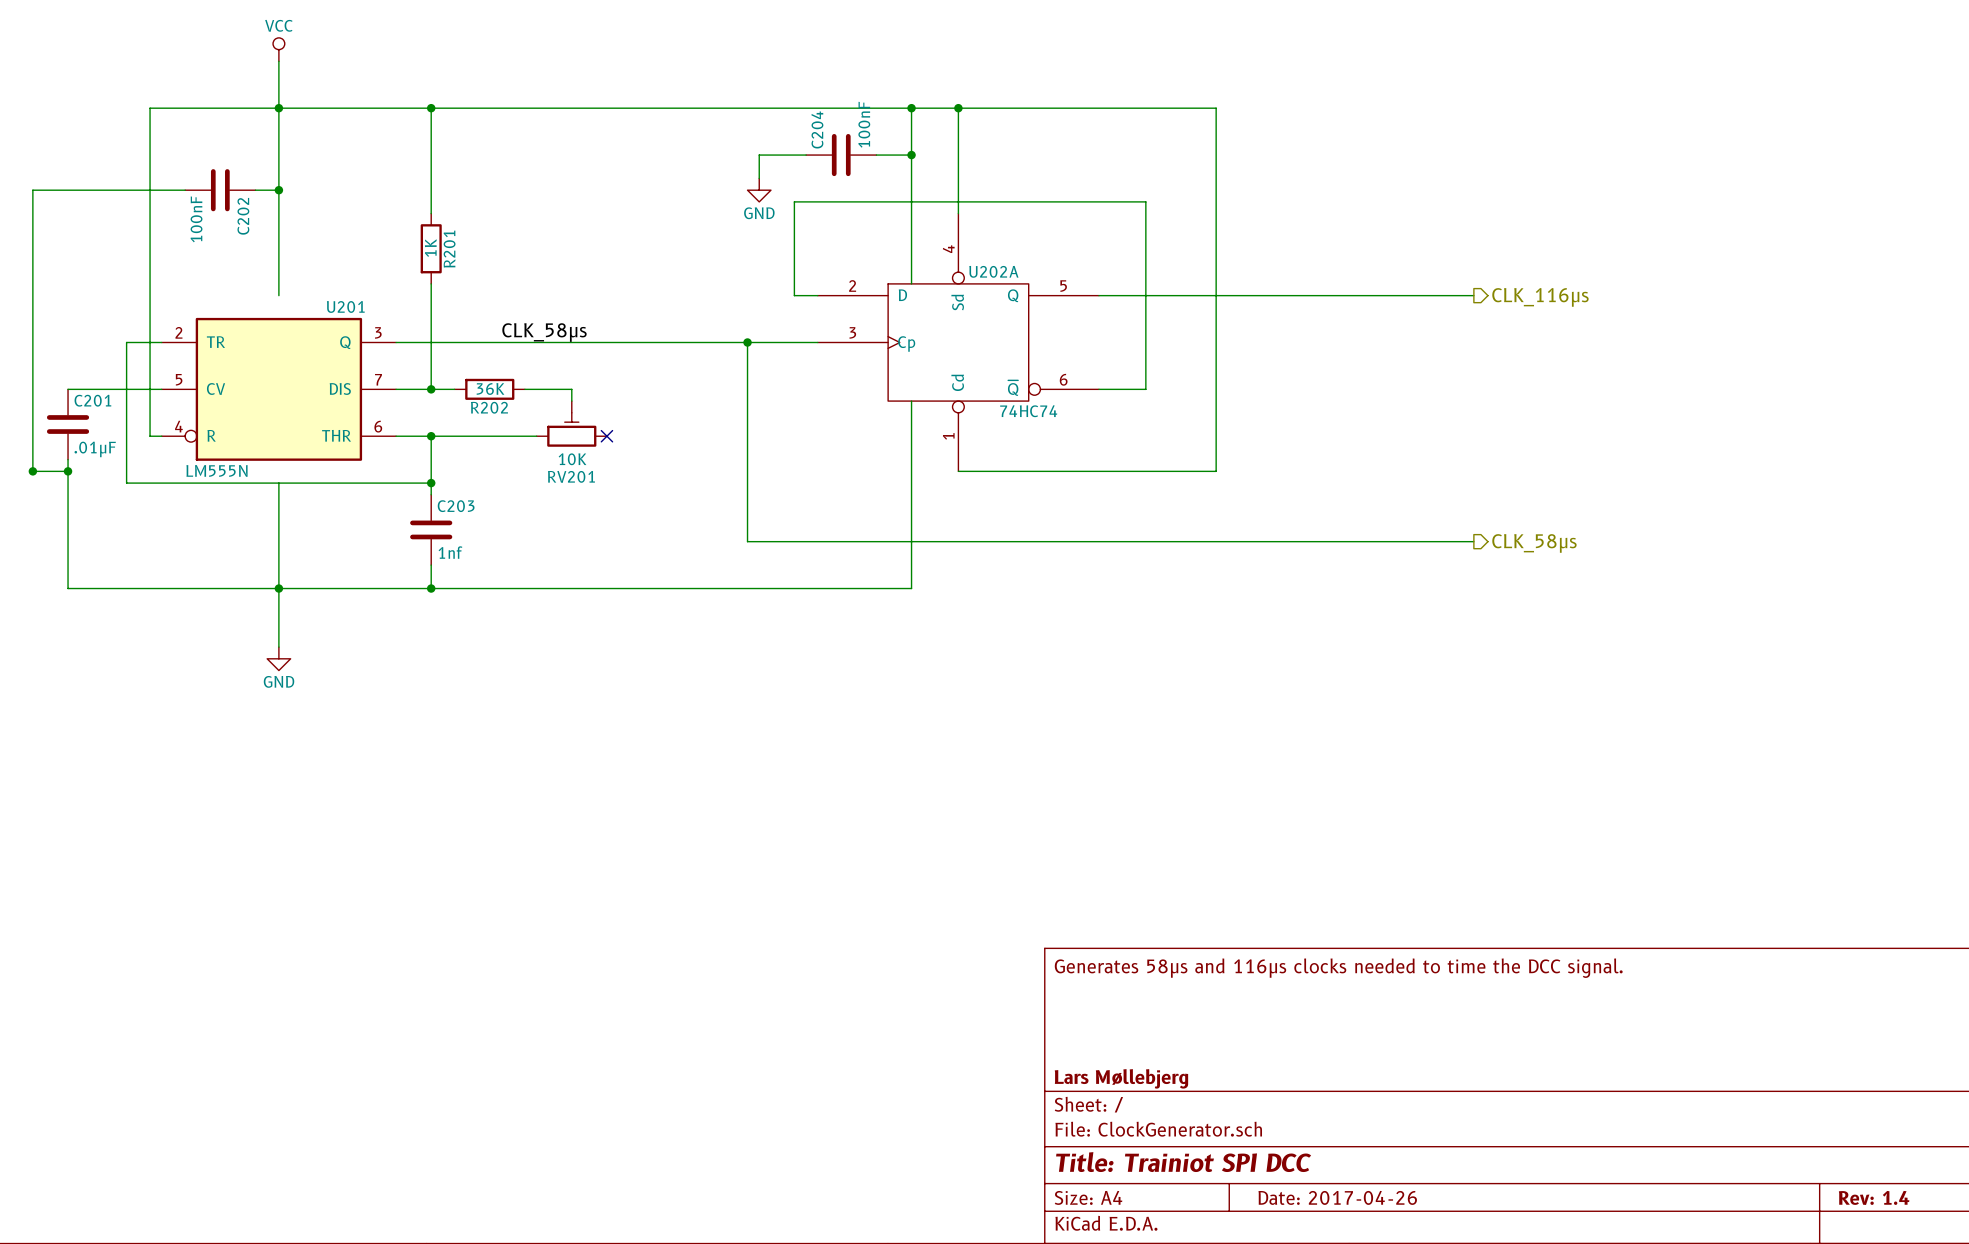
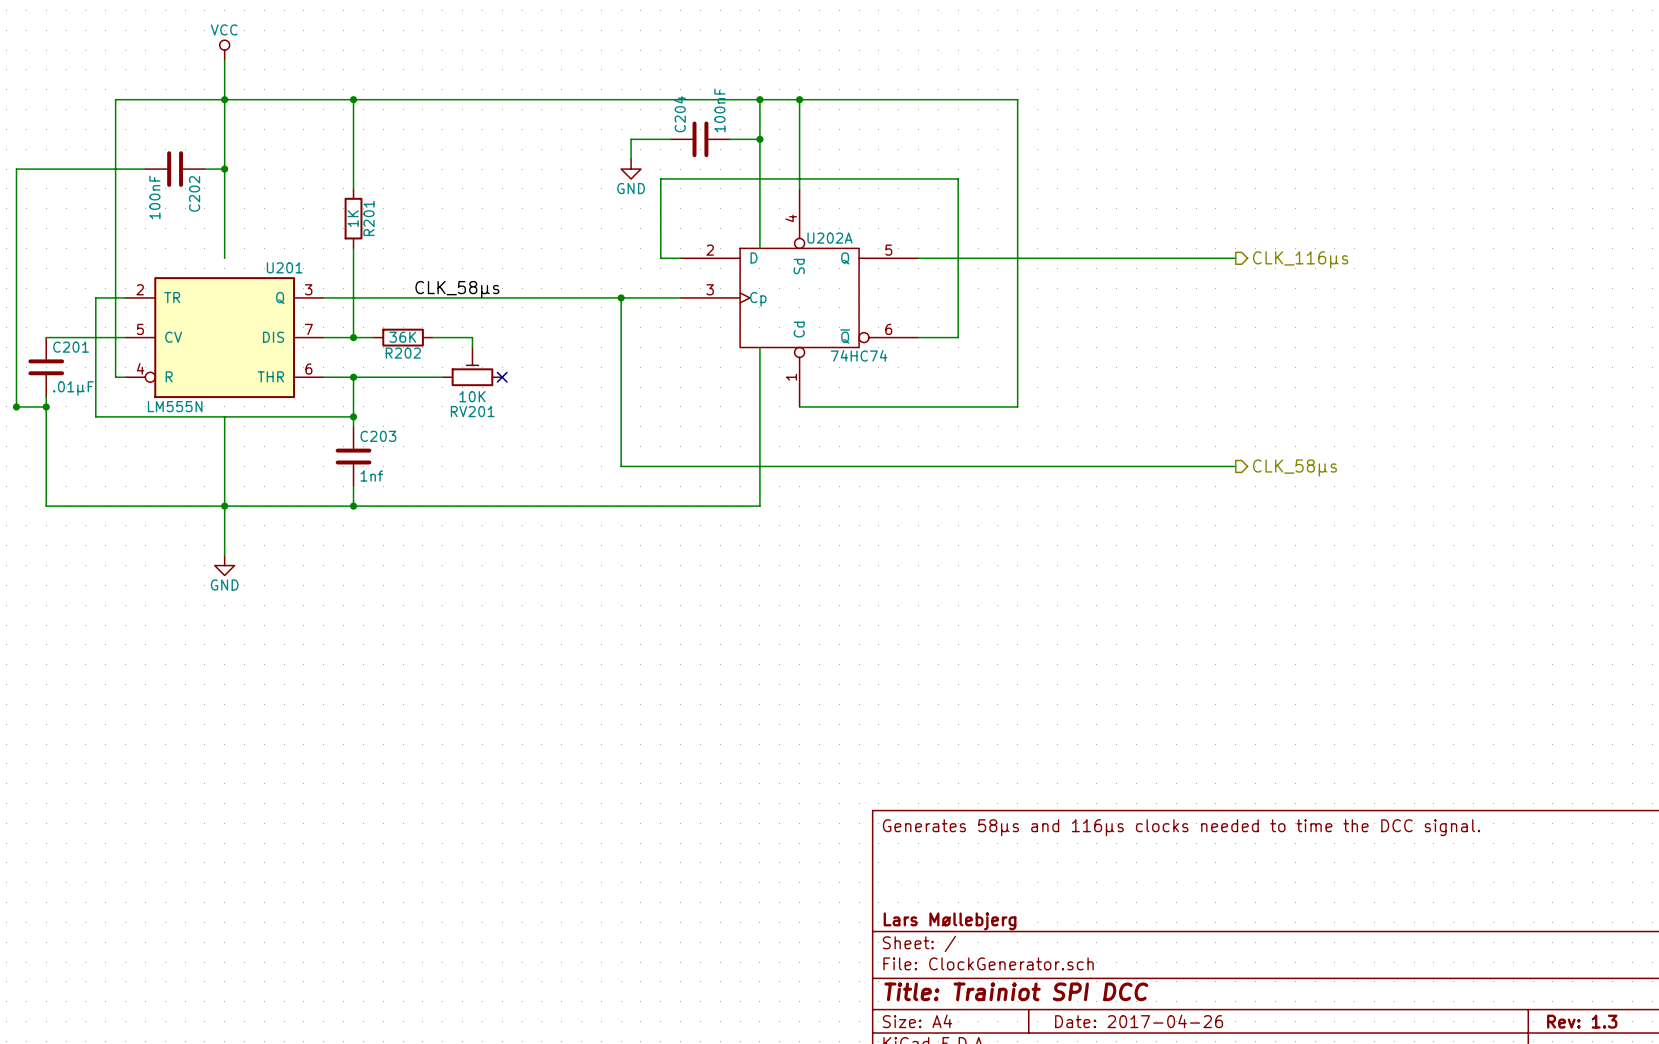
title block: Rev: 1.4 (1874, 1197) -> Rev: 1.3 (1582, 1021)

